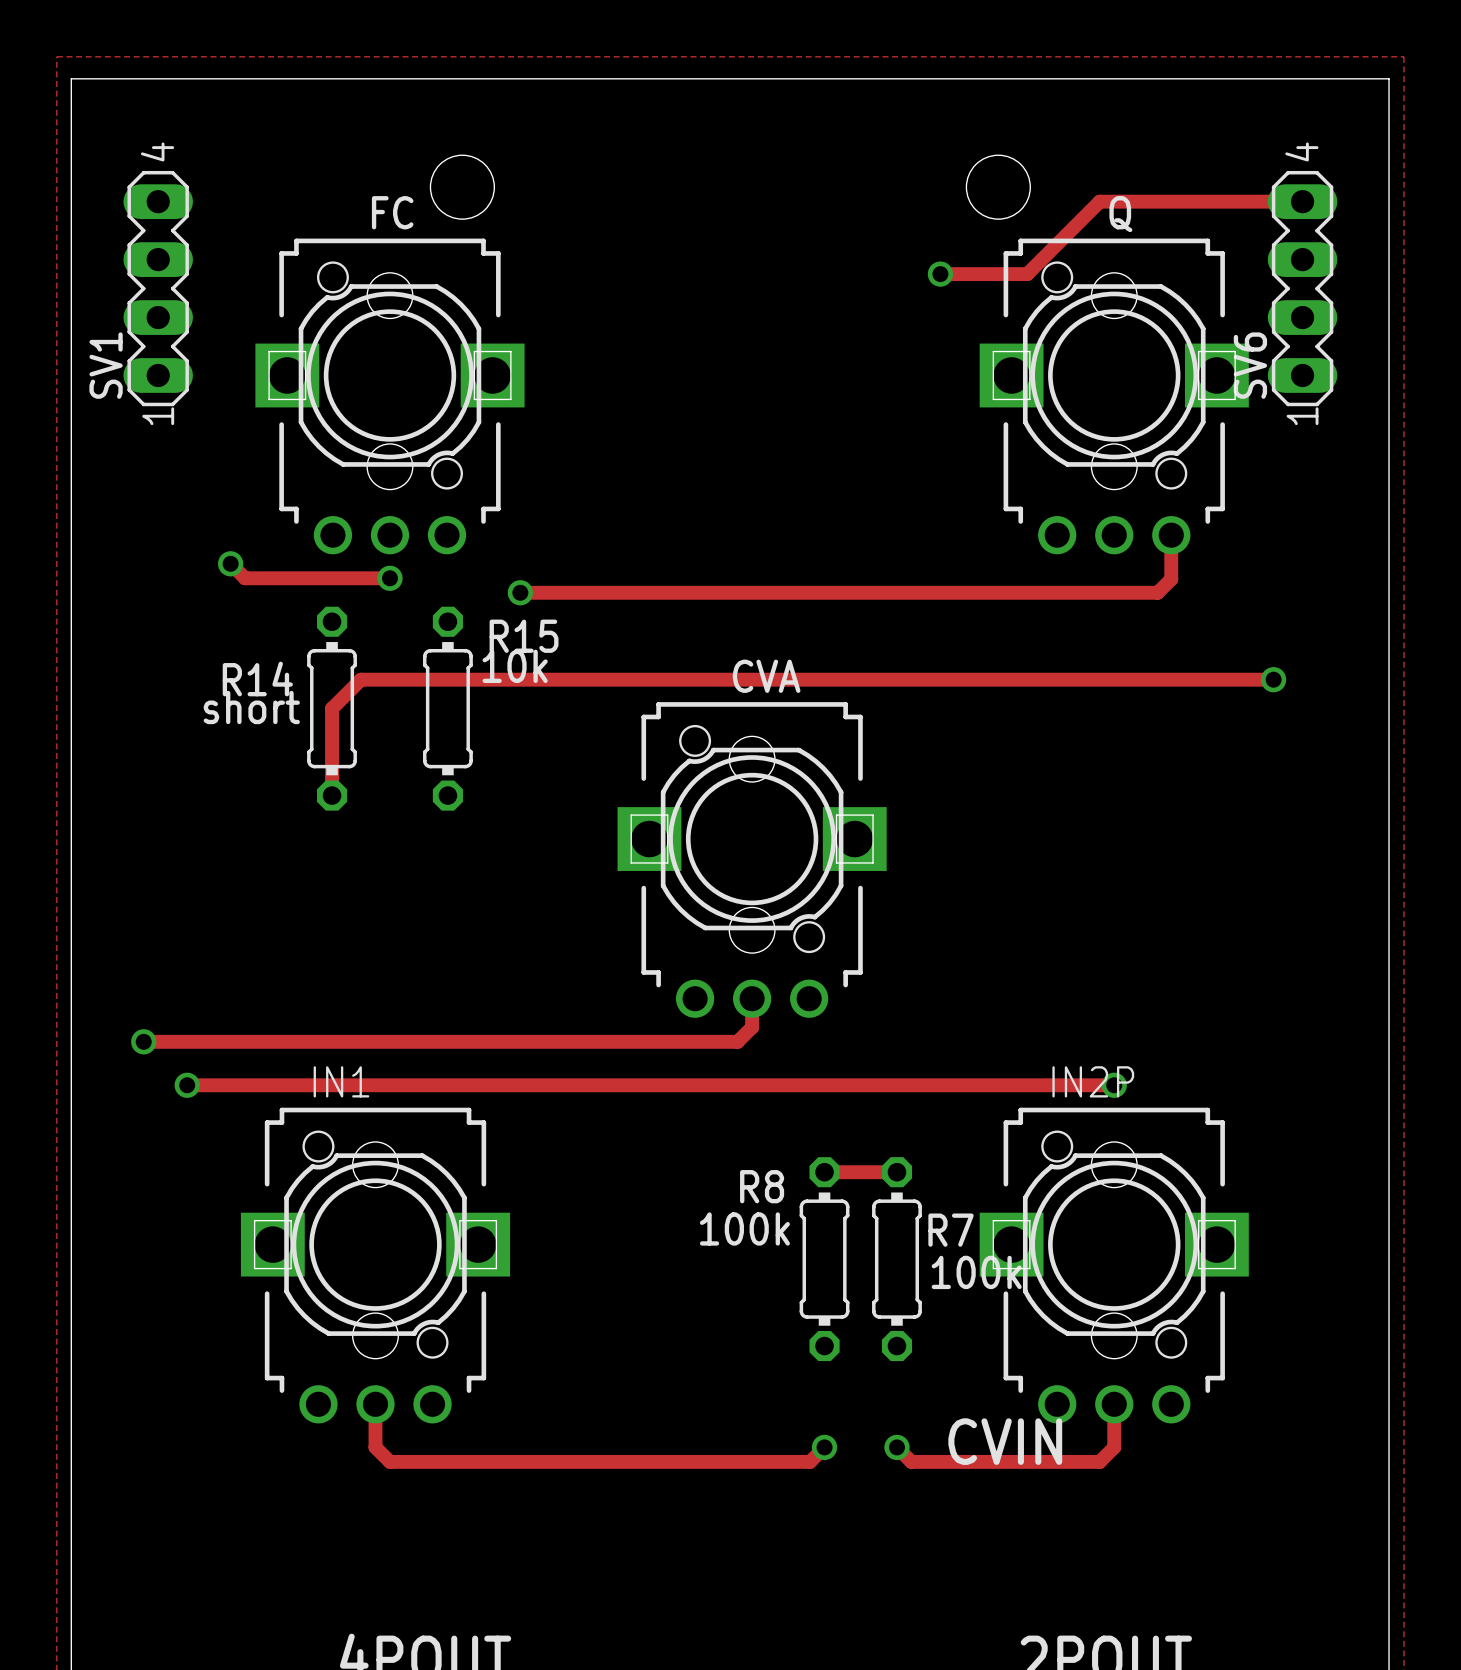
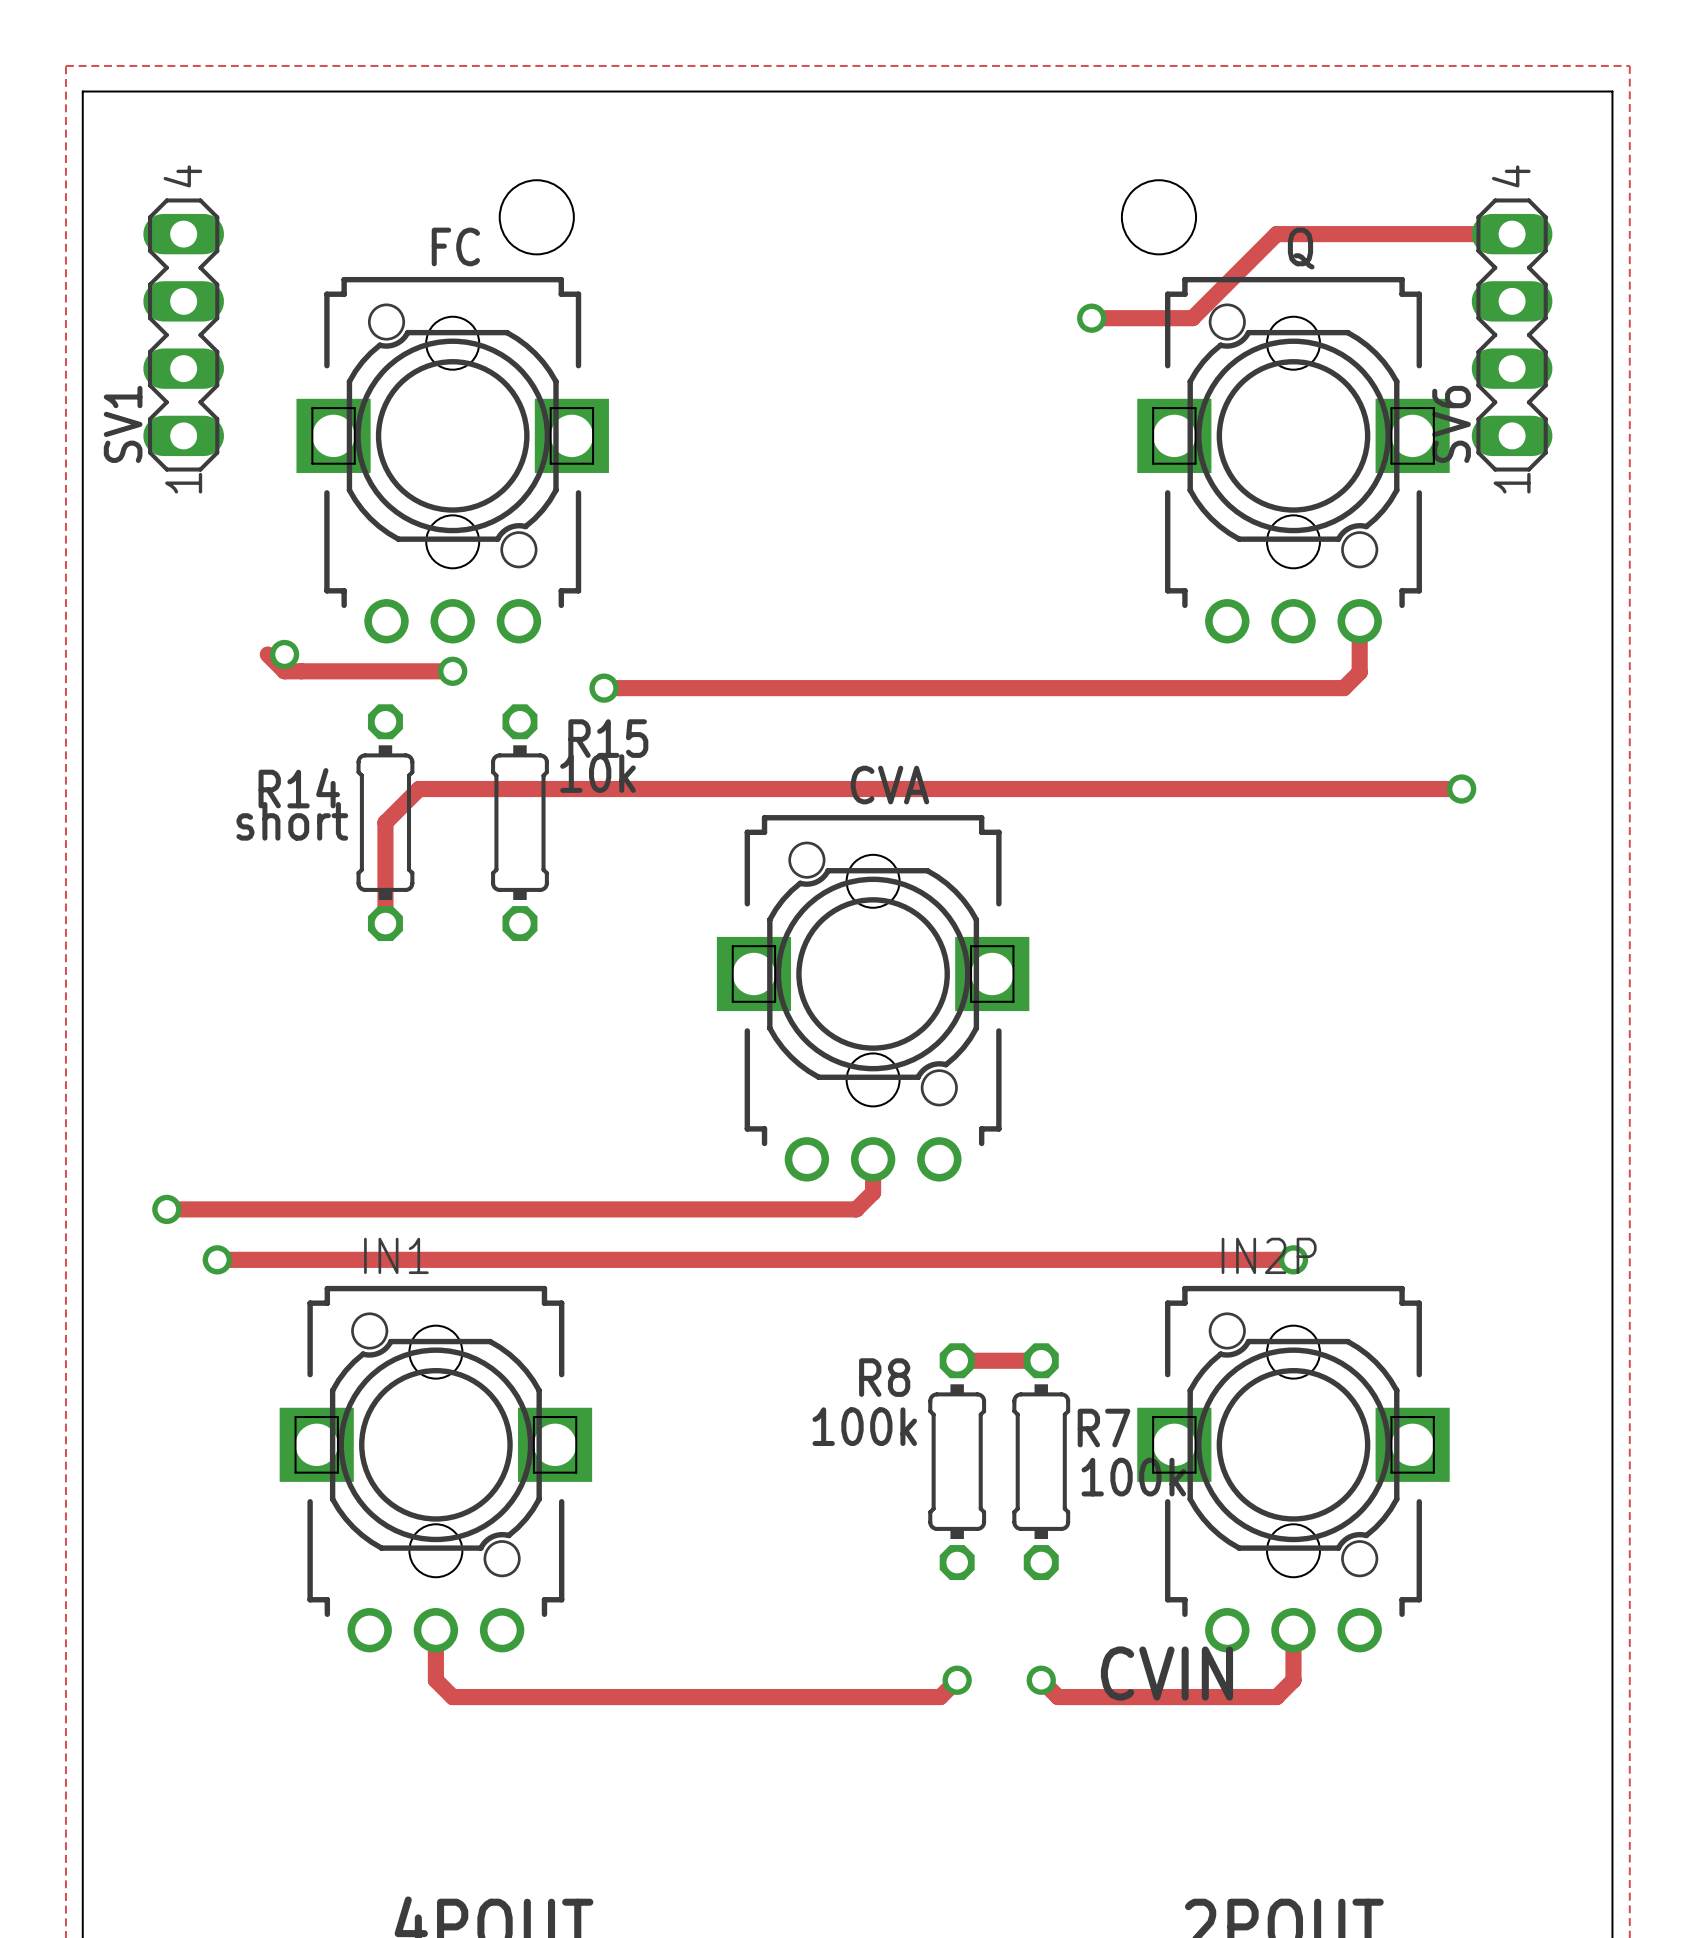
via position: (230, 563) -> (284, 654)
via position: (1273, 679) -> (1461, 789)

